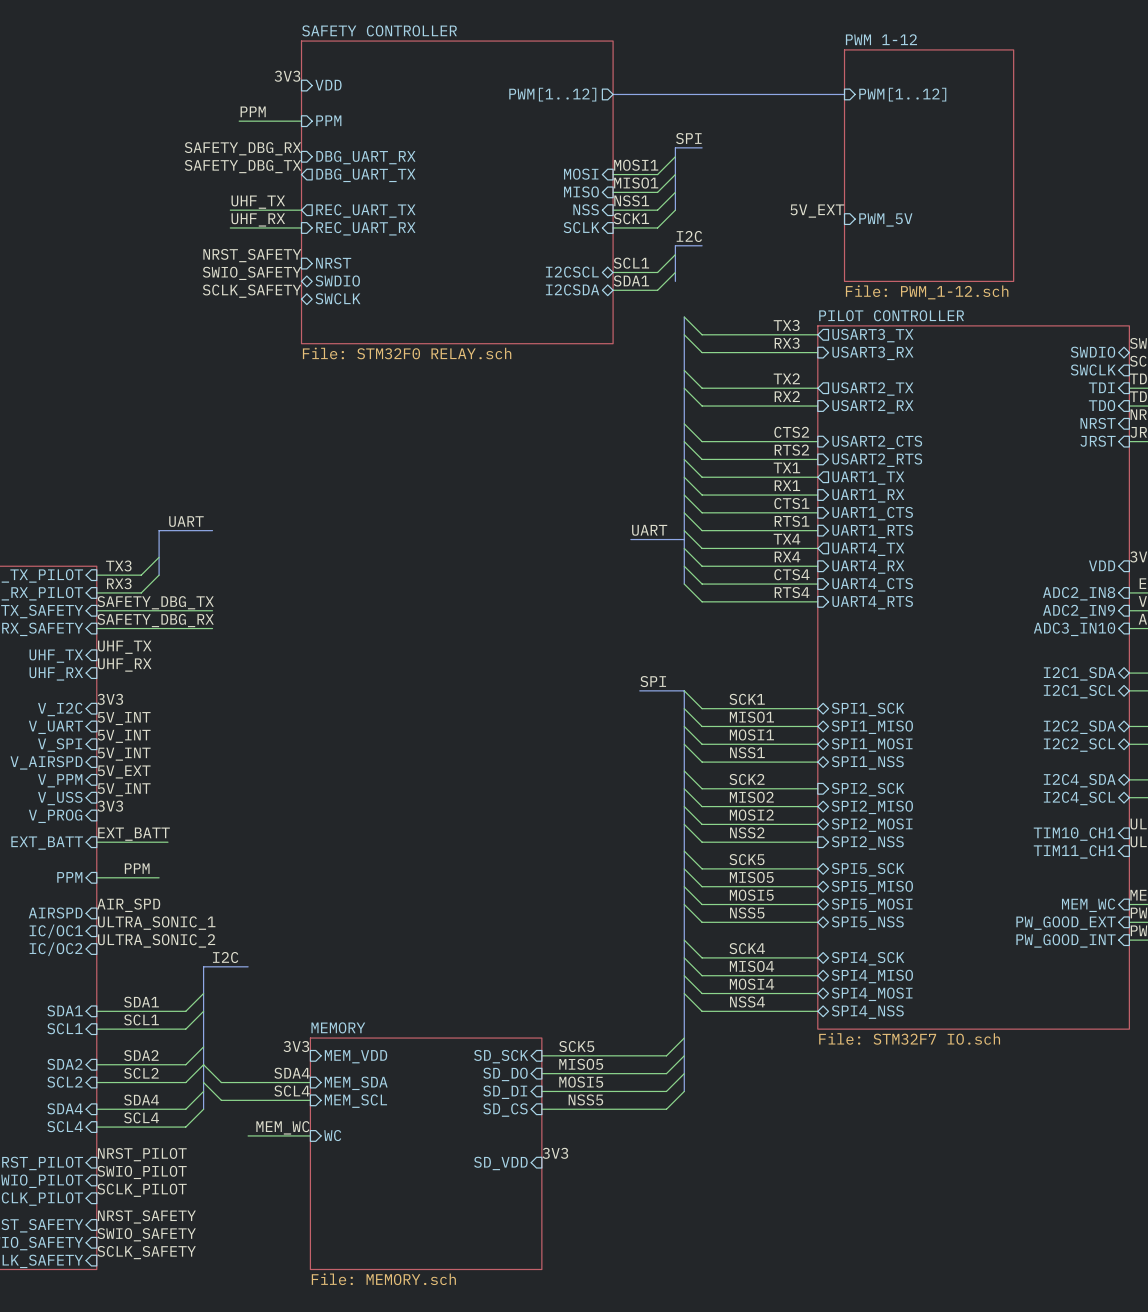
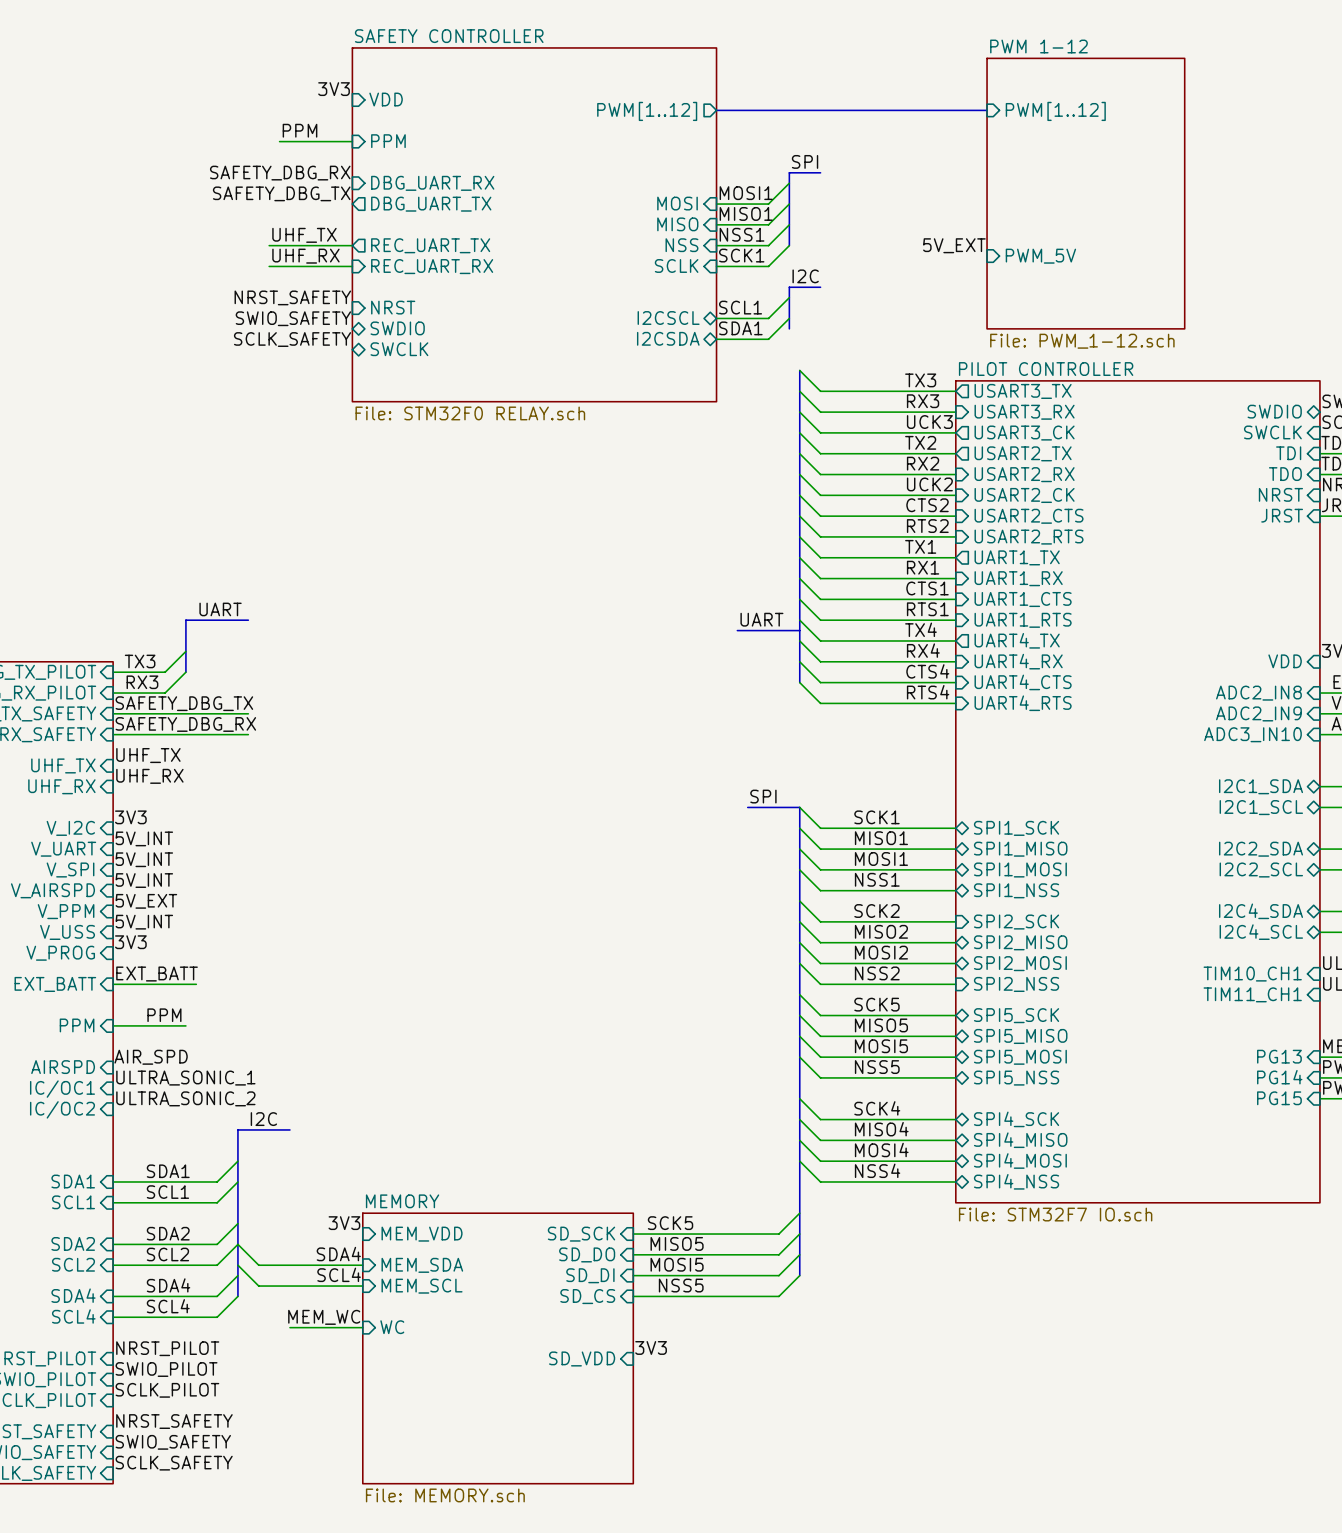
wire: none -> (799, 412) (820, 432) (955, 432)
label: none -> UCK3 (929, 422)
sheet pin: none -> USART3_CK (1024, 433)
wire: none -> (799, 474) (820, 495) (955, 495)
label: none -> UCK2 (929, 484)
sheet pin: none -> USART2_CK (1024, 495)
sheet pin: MEM_WC (1088, 905) -> PG13 (1279, 1056)
sheet pin: PW_GOOD_EXT (1066, 923) -> PG14 (1279, 1077)
sheet pin: PW_GOOD_INT (1066, 940) -> PG15 (1279, 1098)

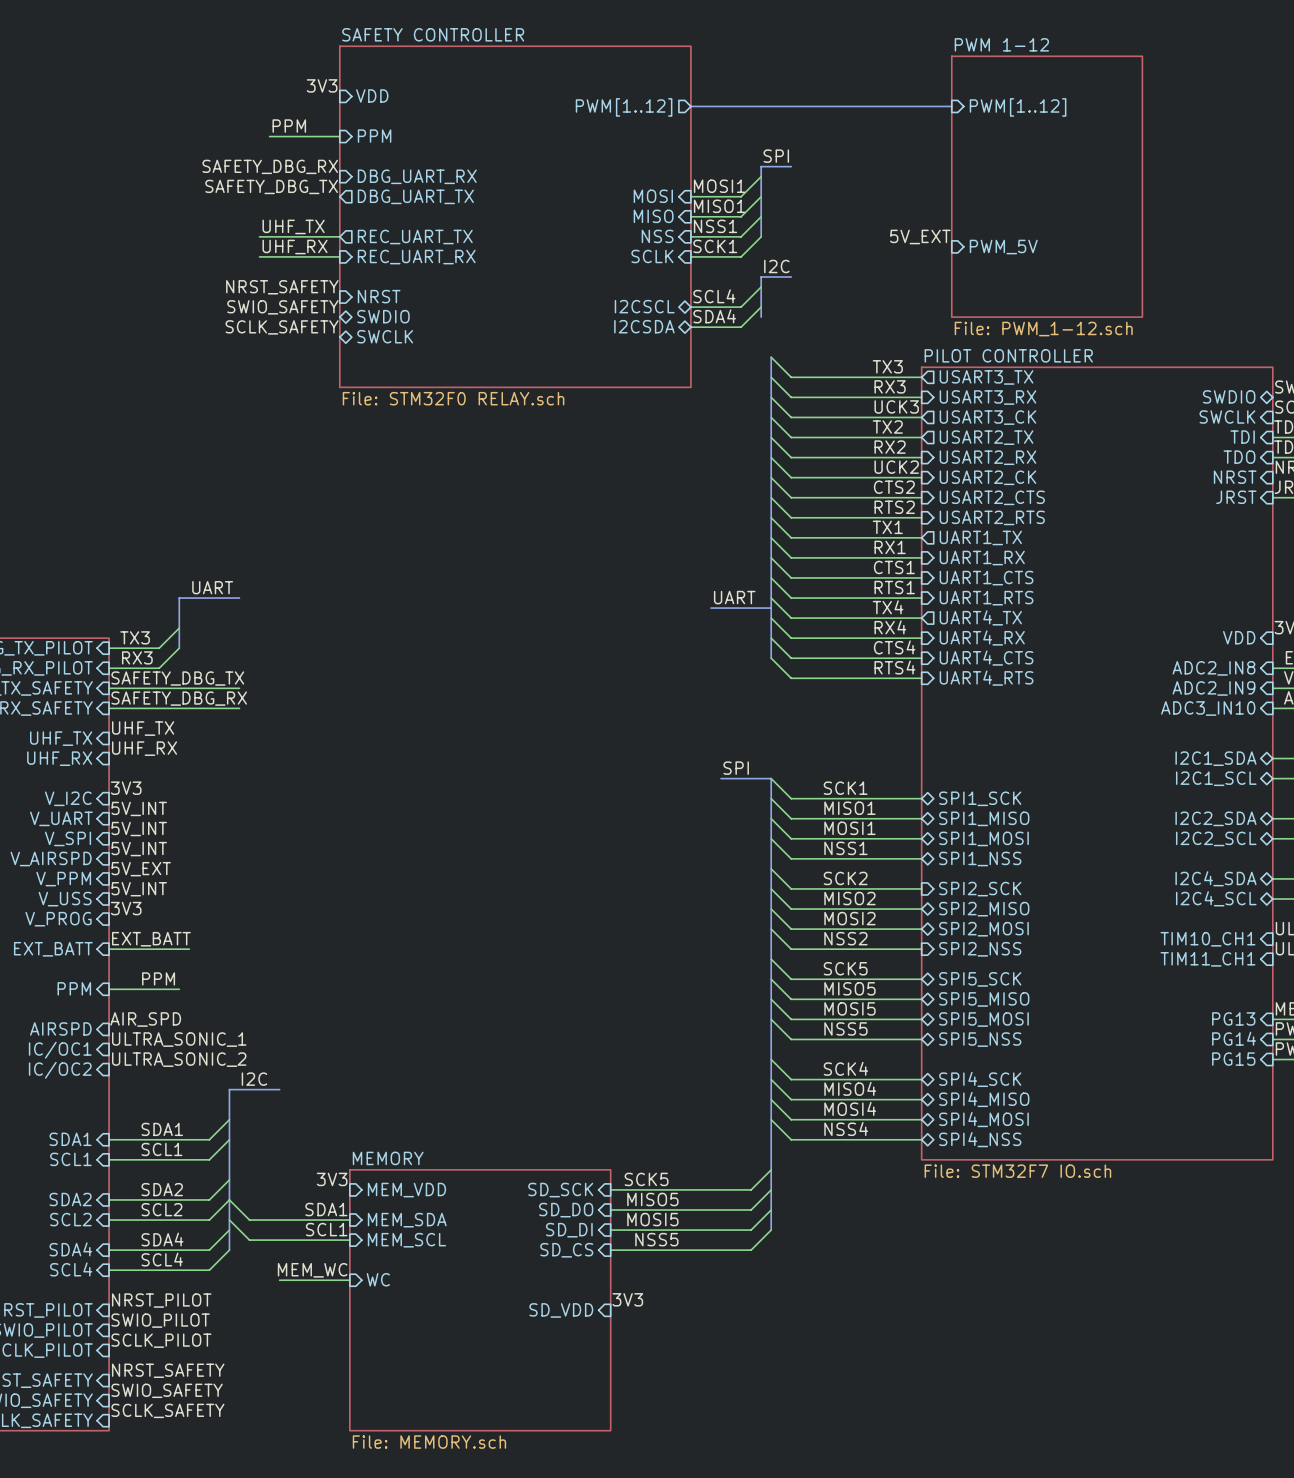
label: SCL1 (740, 307) -> SCL4 (714, 296)
label: SDA1 (740, 328) -> SDA4 (714, 316)
label: SDA4 (338, 1254) -> SDA1 (326, 1209)
label: SCL4 (339, 1274) -> SCL1 (326, 1229)

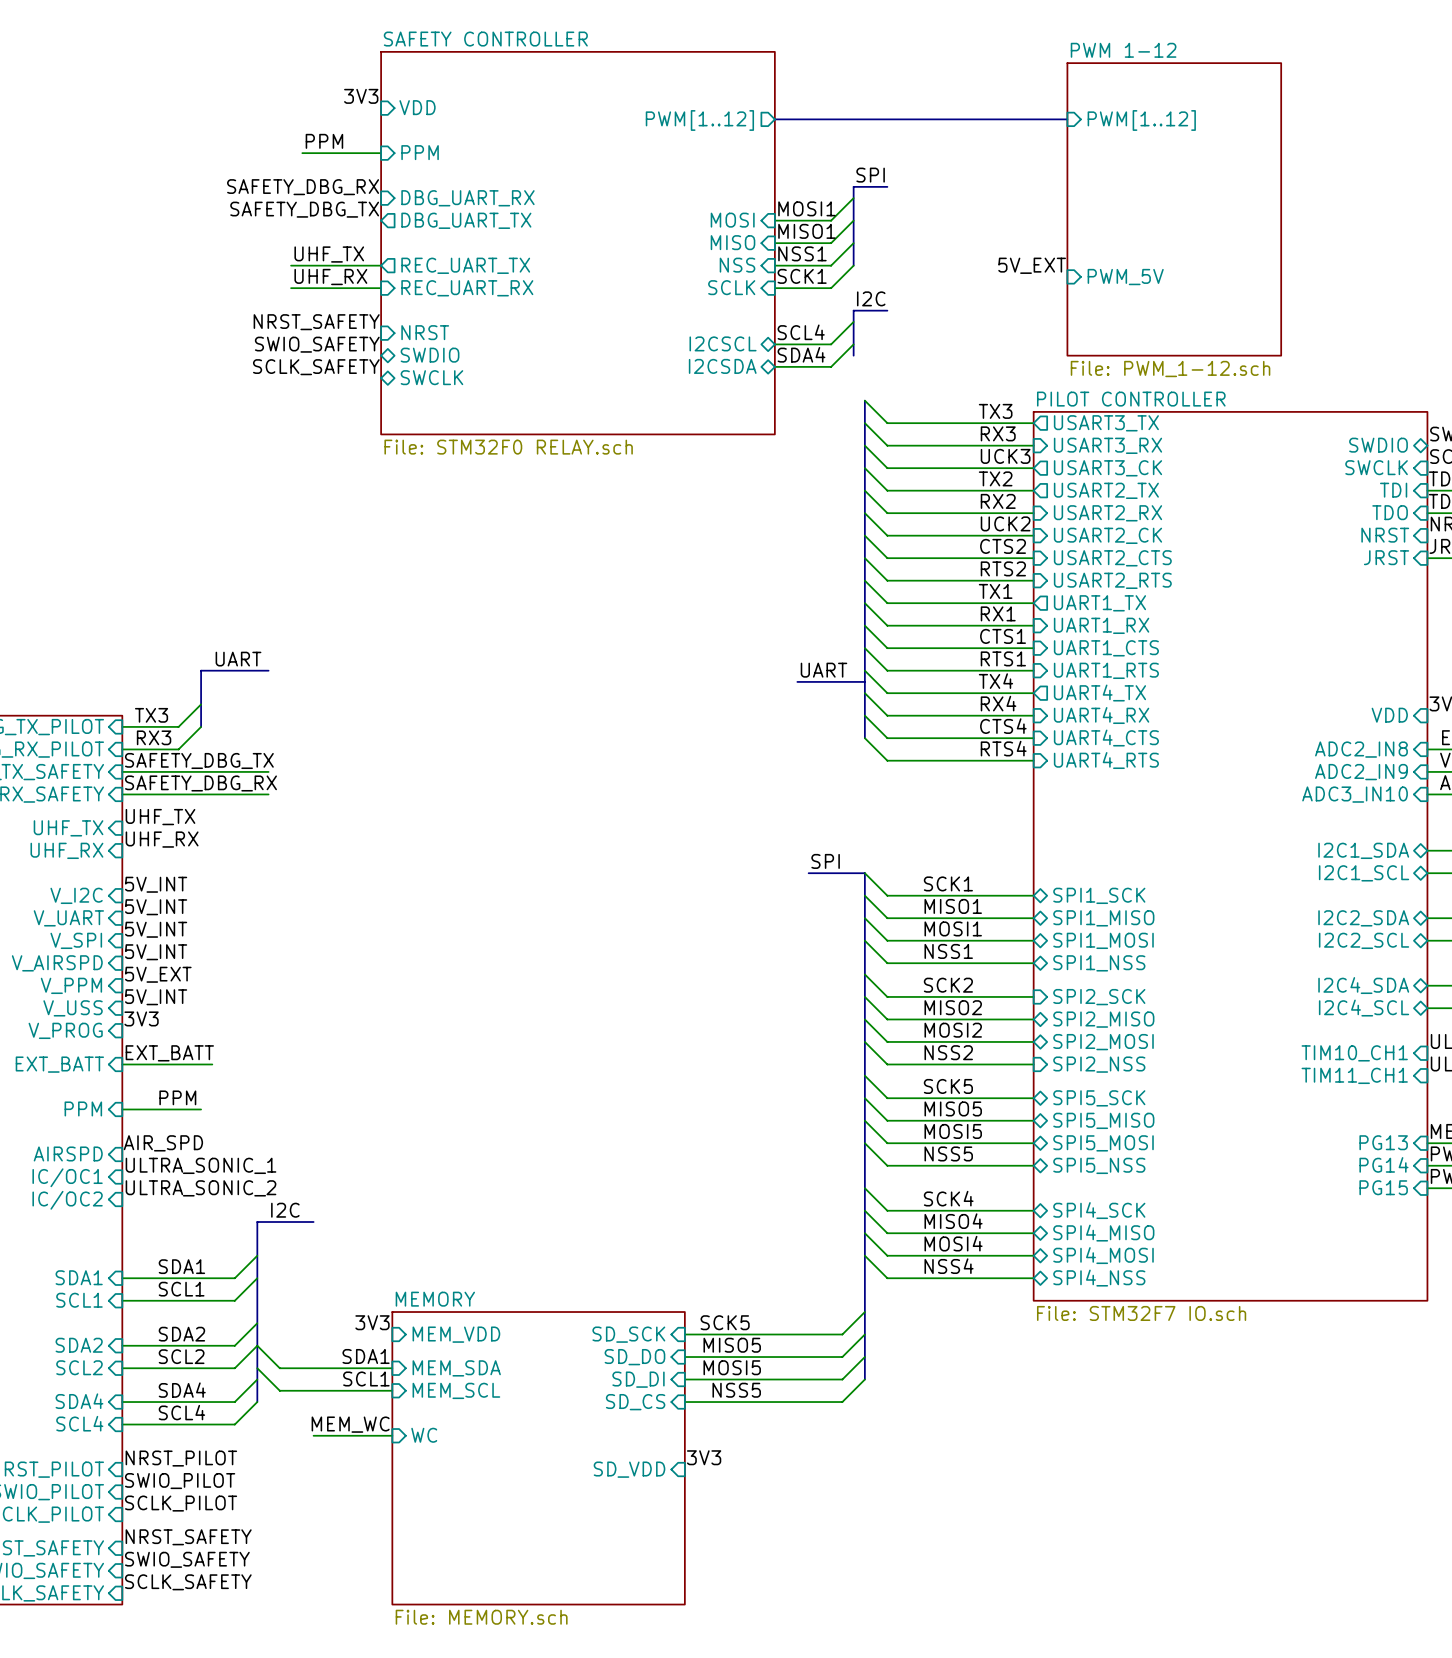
label: 3V3 (126, 788) -> 5V_INT (156, 884)

